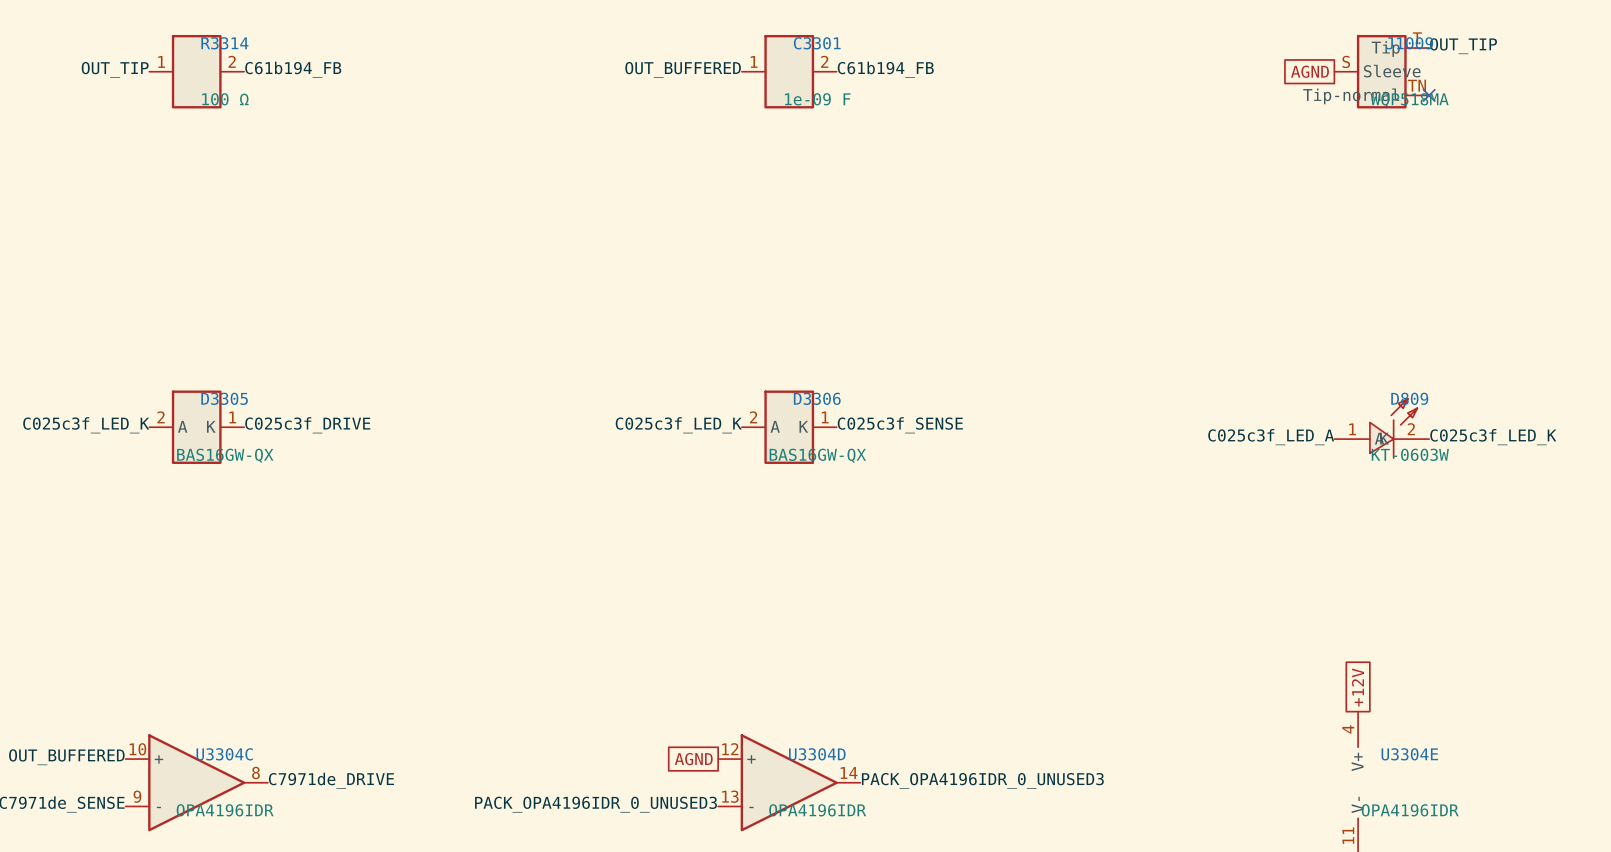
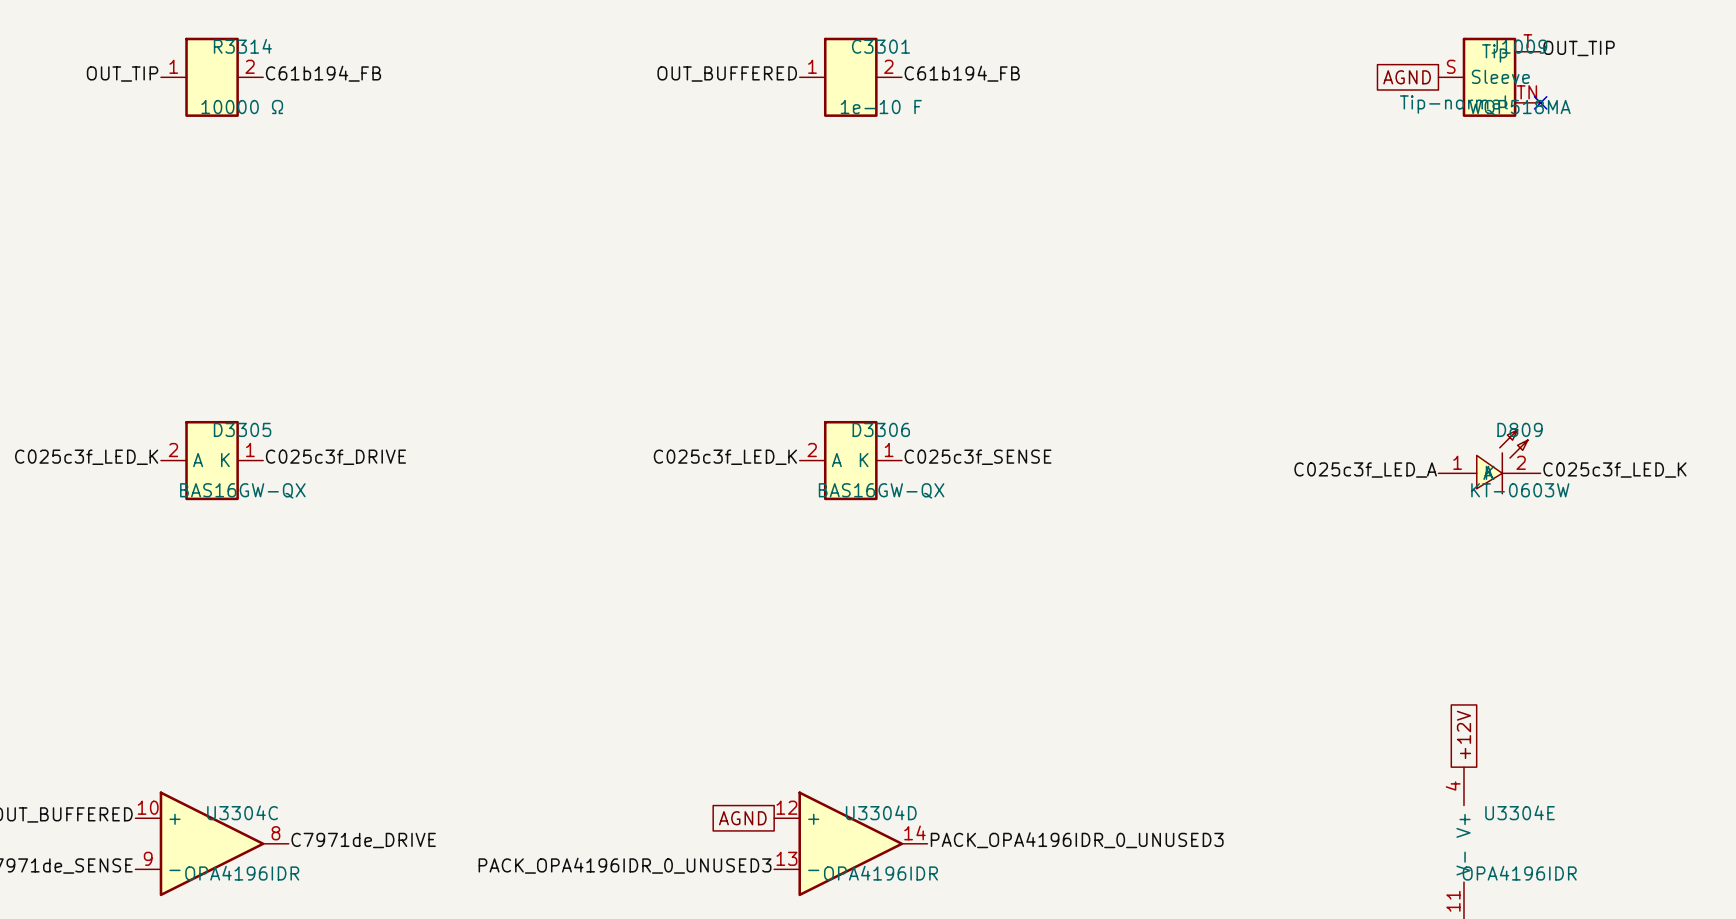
R3314 value: 100 Ω (225, 99) -> 10000 Ω (242, 107)
C3301 value: 1e-09 F (817, 99) -> 1e-10 F (881, 107)

